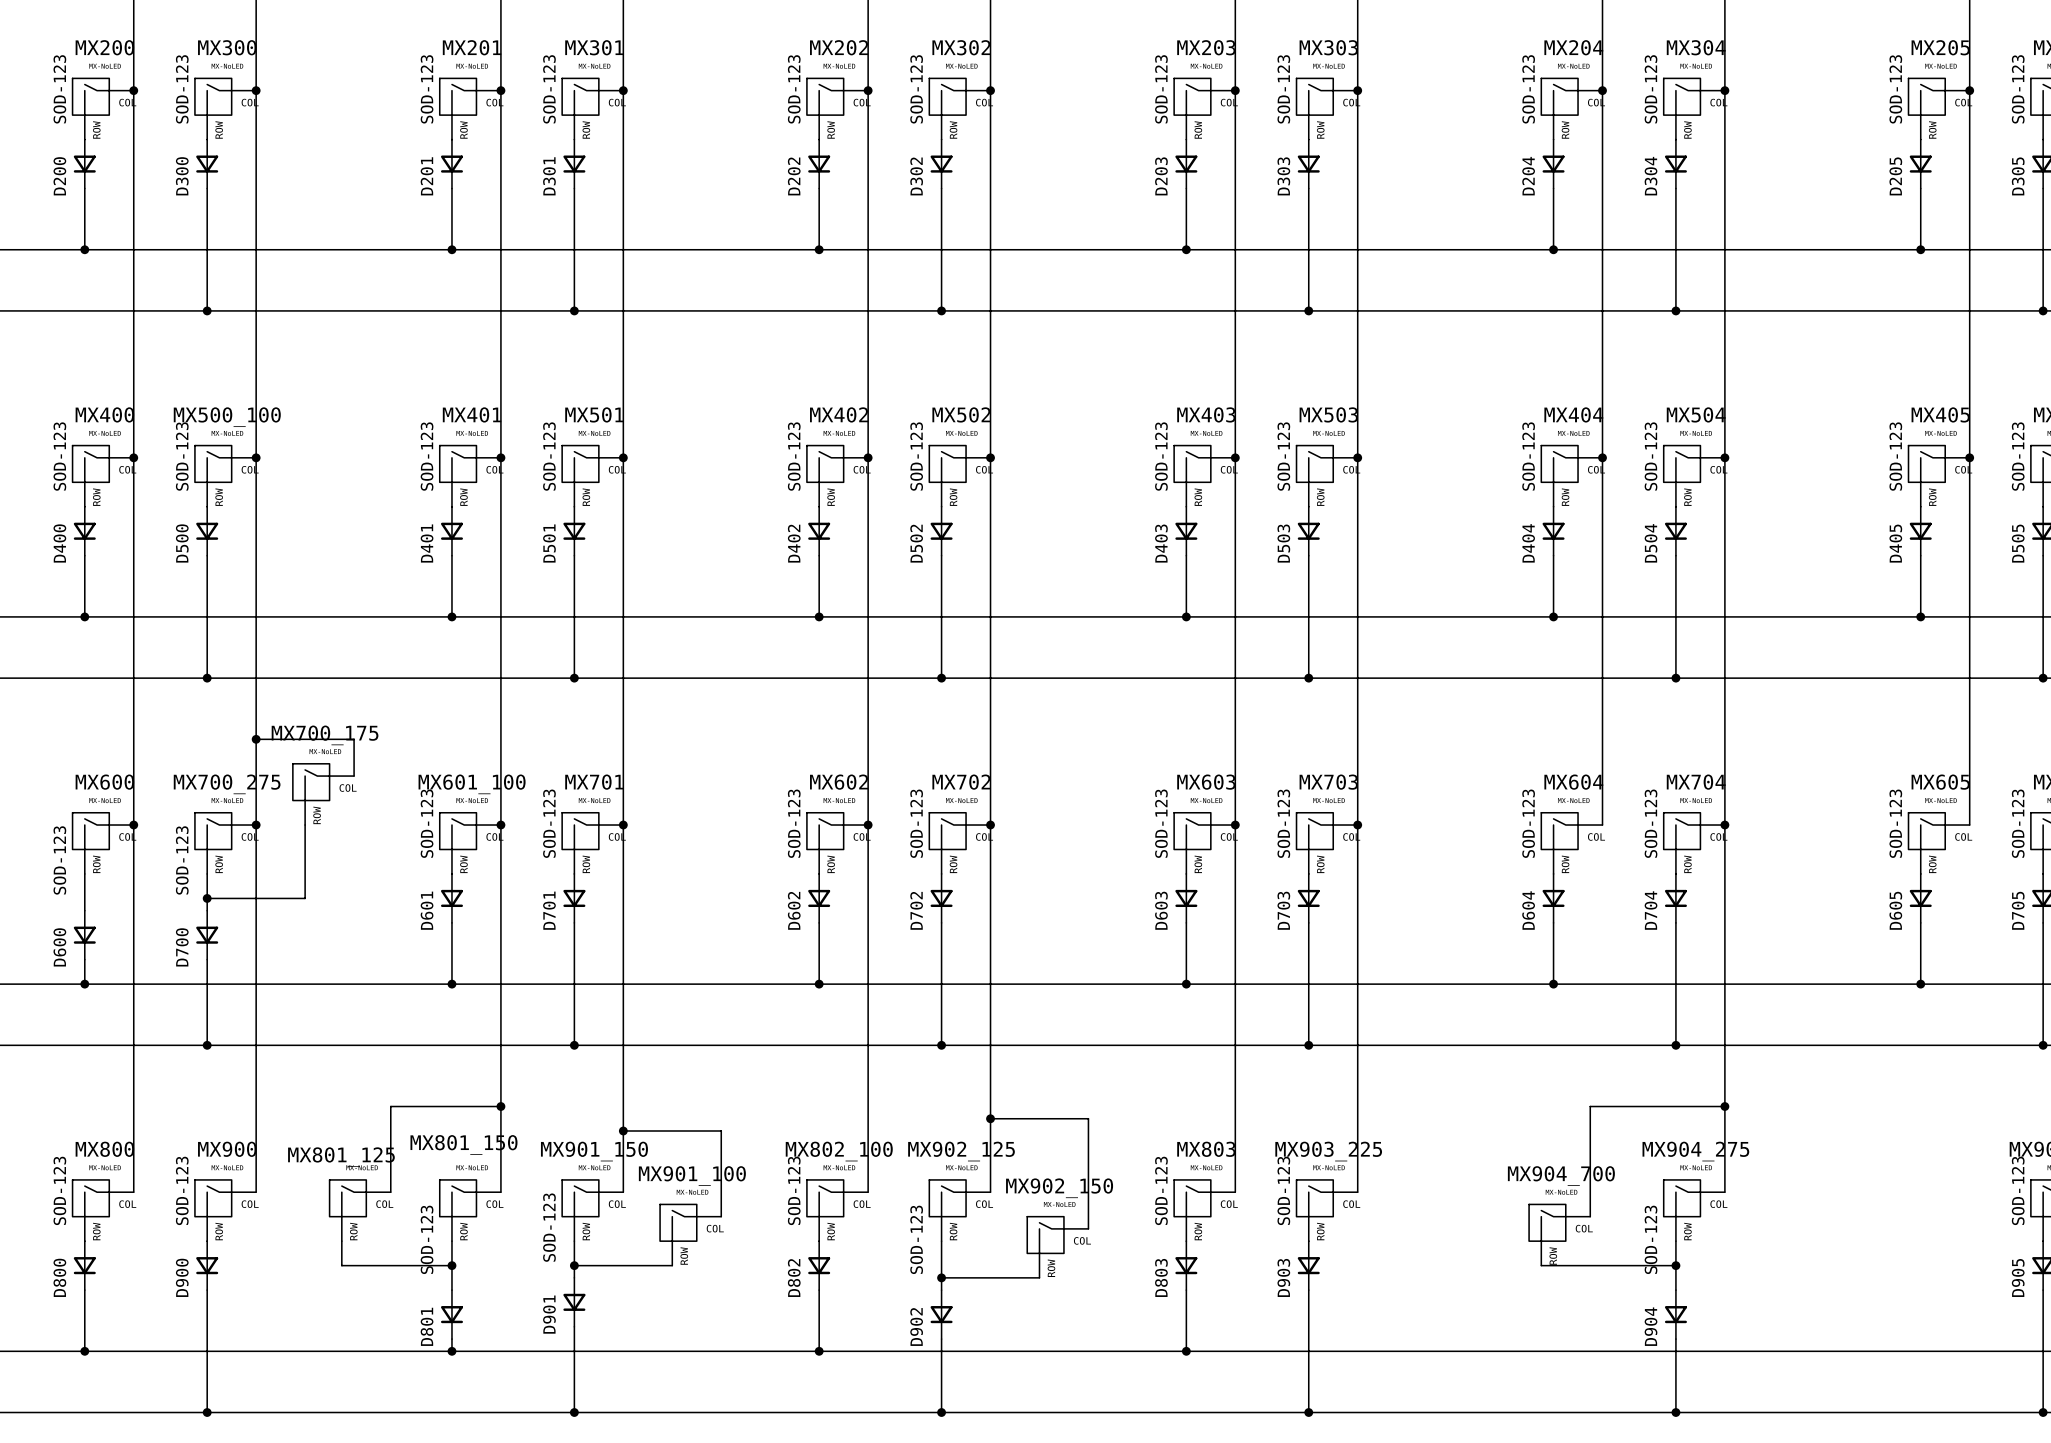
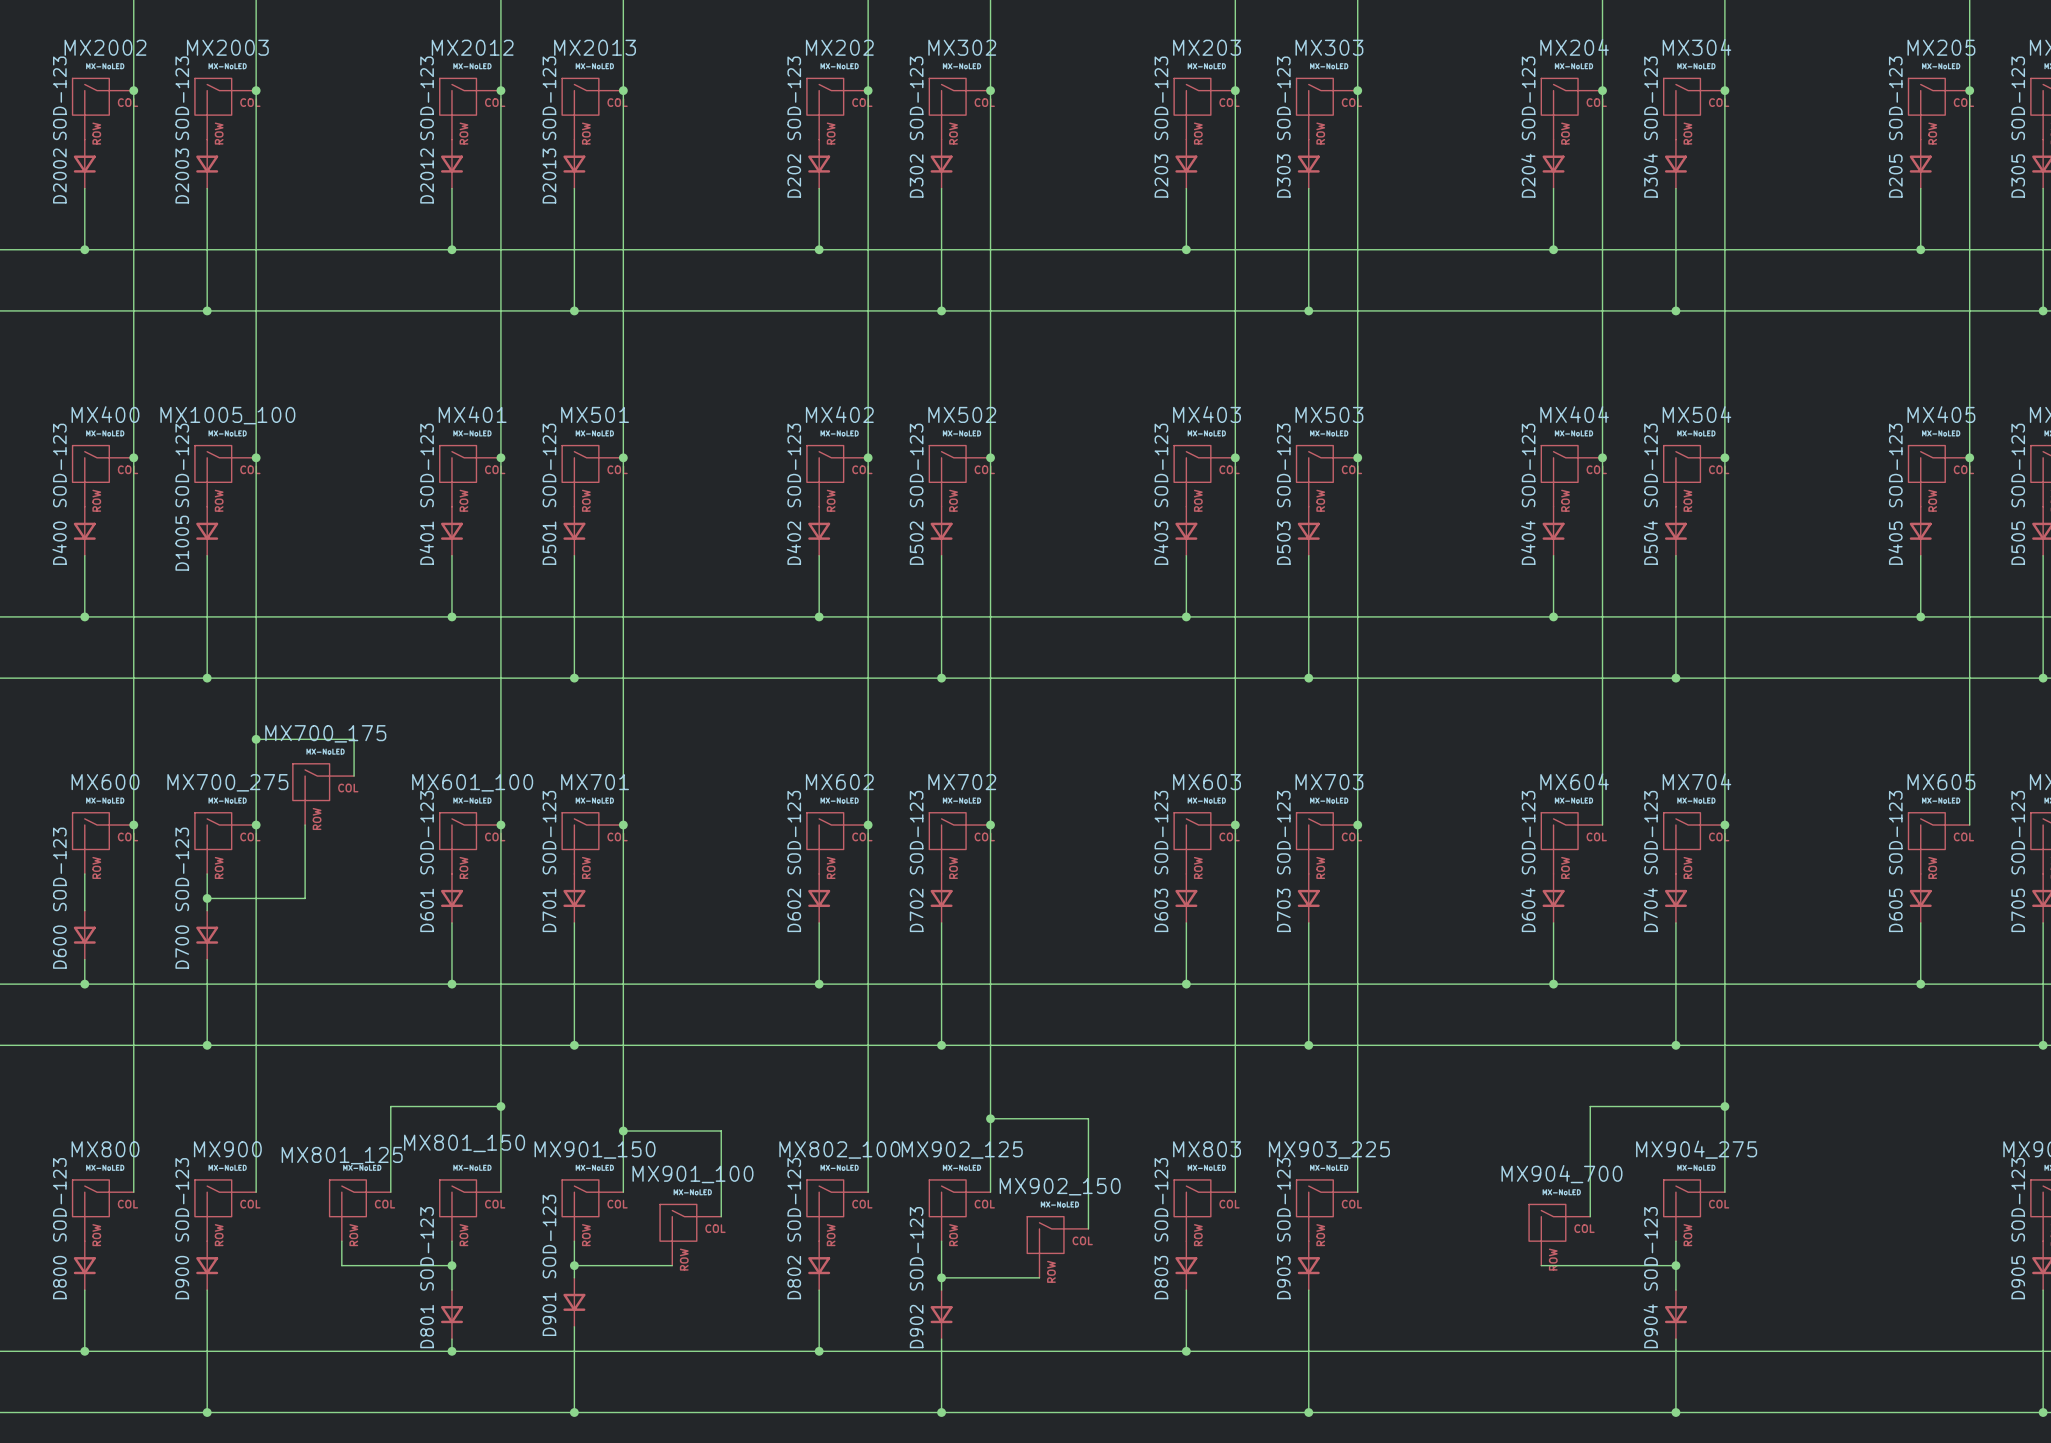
MX200 name: MX200 (104, 47) -> MX2002 (105, 47)
MX300 name: MX300 (227, 47) -> MX2003 (227, 47)
MX201 name: MX201 (472, 47) -> MX2012 (472, 47)
MX301 name: MX301 (594, 47) -> MX2013 (595, 47)
D200 name: D200 (59, 176) -> D2002 (59, 176)
D300 name: D300 (182, 176) -> D2003 (182, 176)
D201 name: D201 (427, 176) -> D2012 (427, 176)
D301 name: D301 (549, 176) -> D2013 (549, 176)
MX500_100 name: MX500_100 (227, 417) -> MX1005_100 (227, 415)
D500 name: D500 (182, 543) -> D1005 (182, 543)

